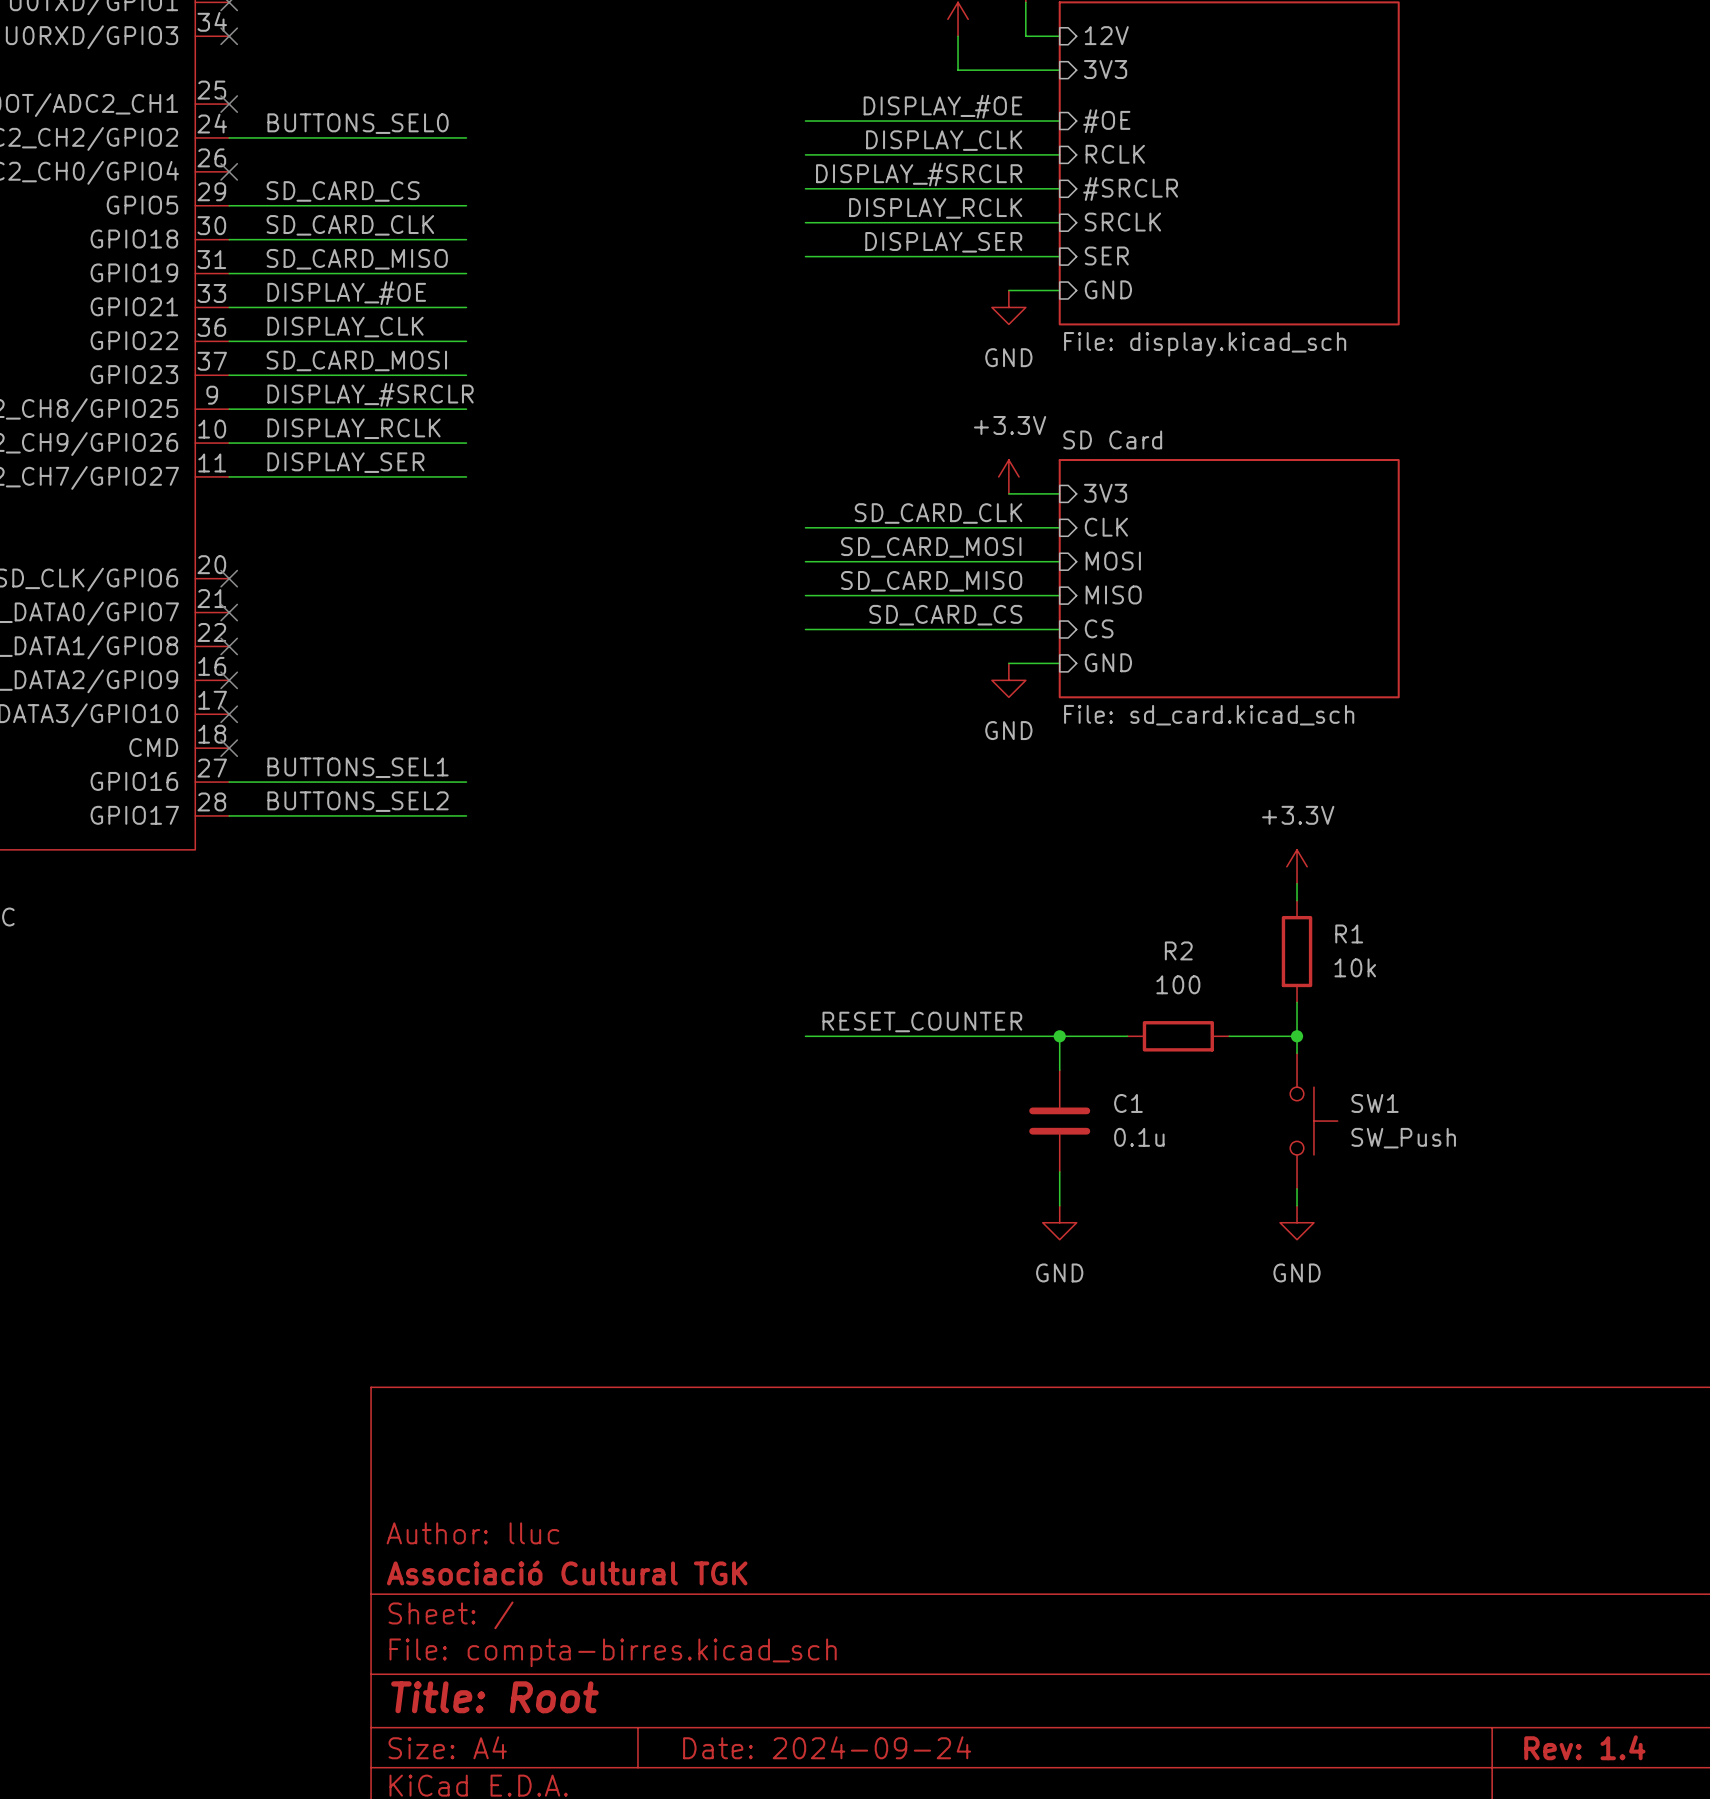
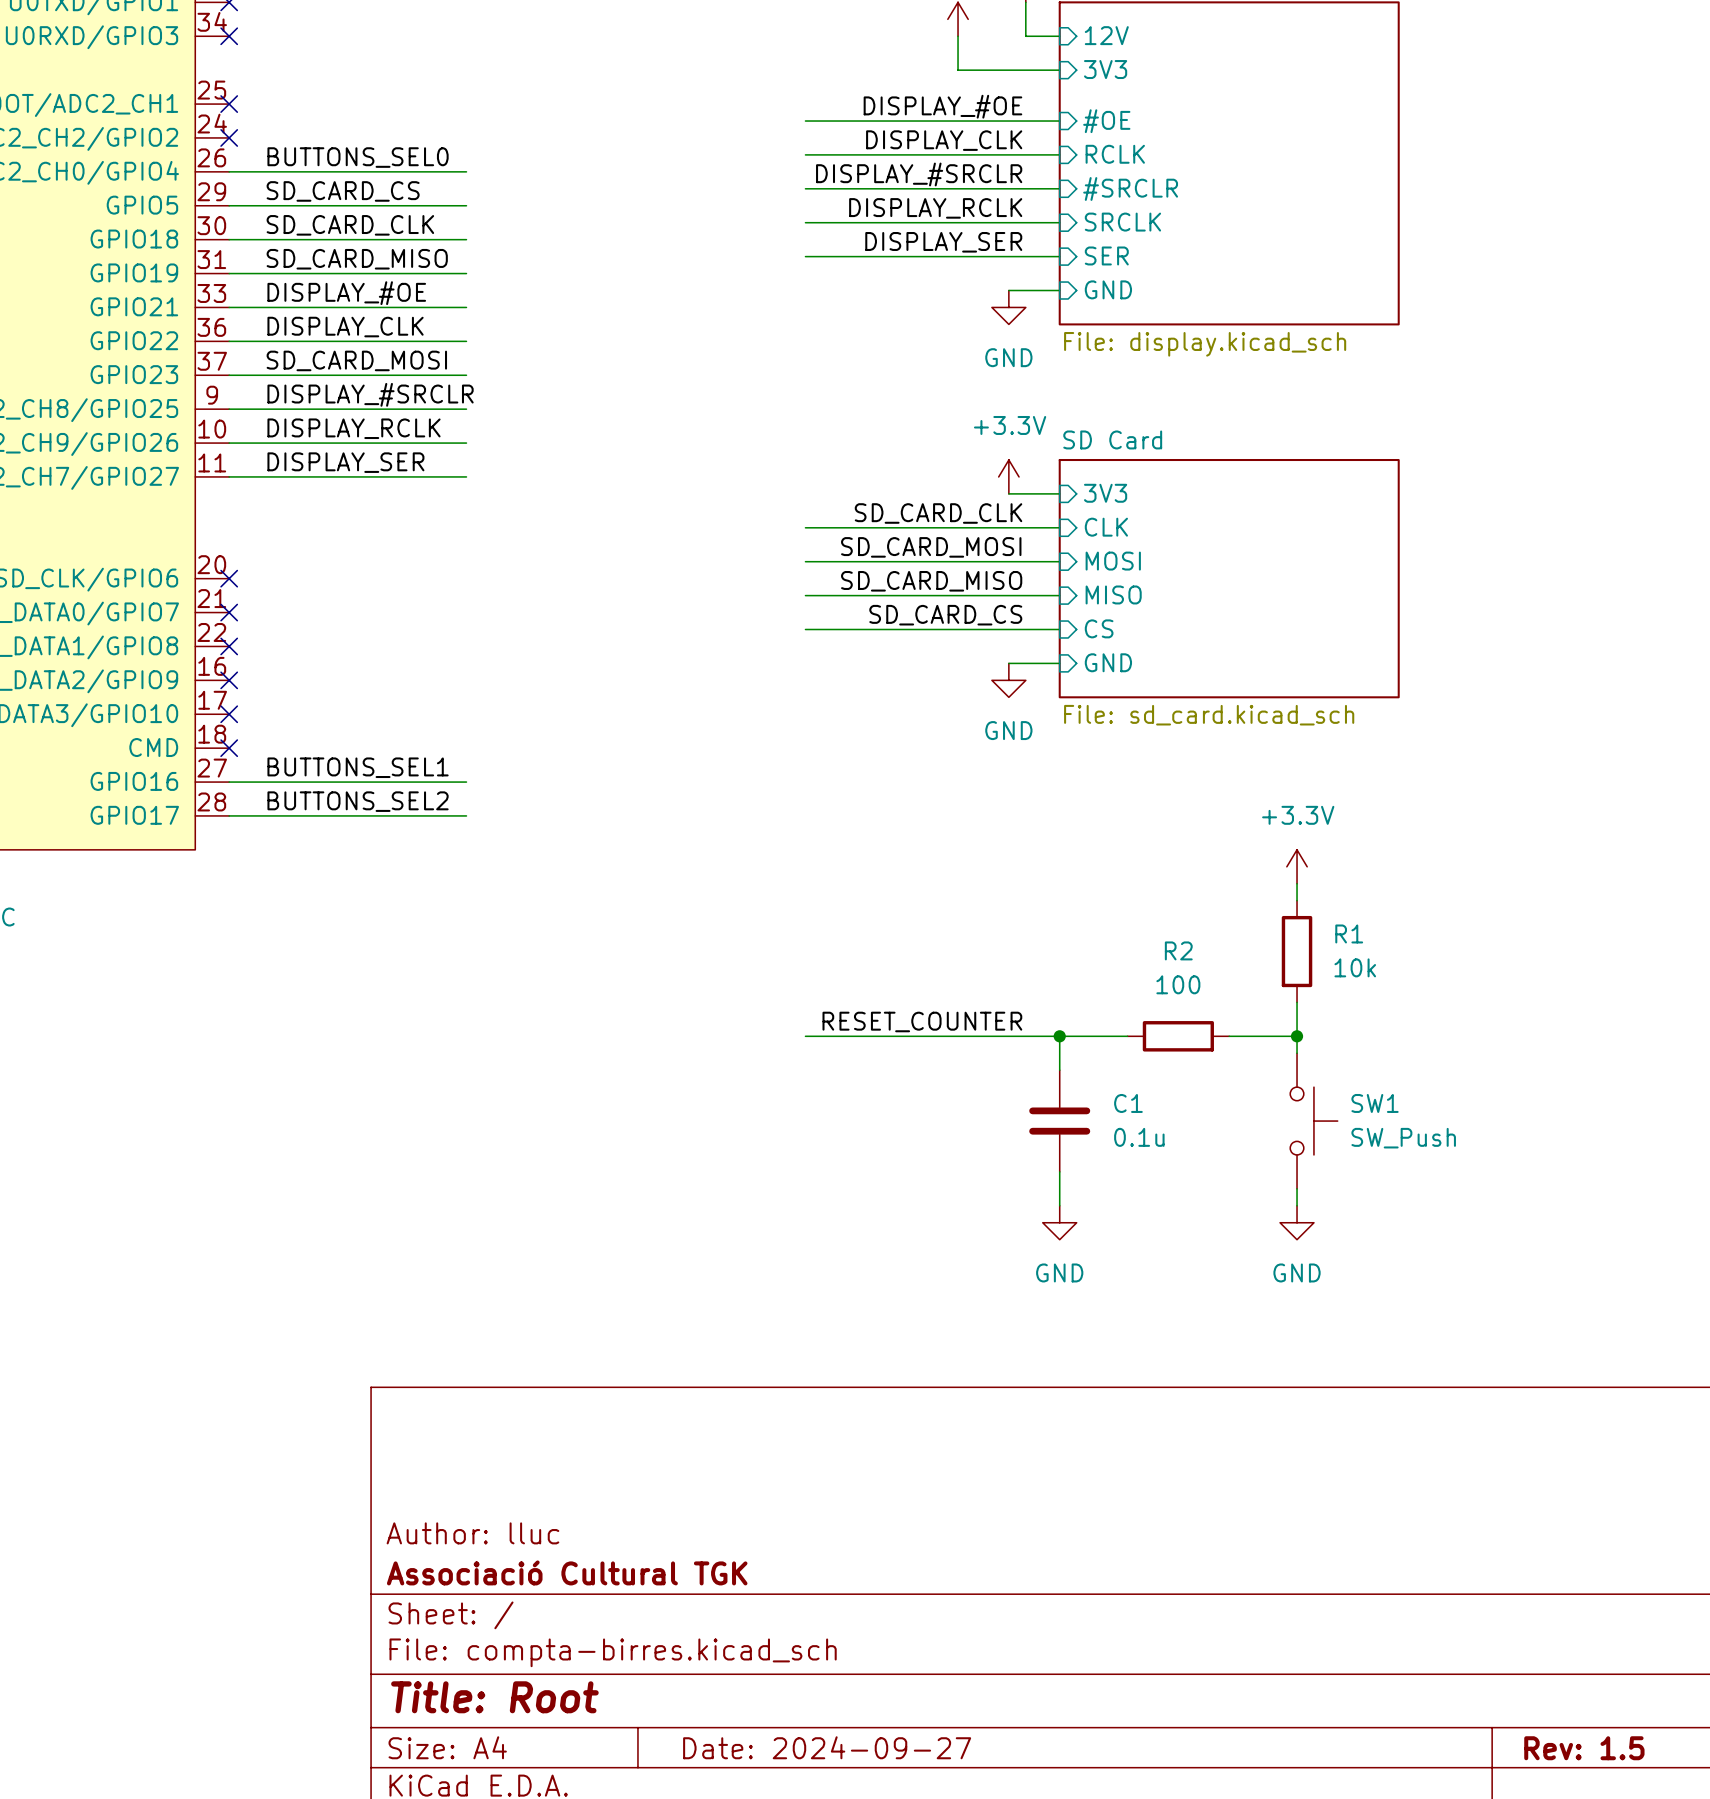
label position: BUTTONS_SEL0 (358, 123) -> BUTTONS_SEL0 (358, 157)
wire: (229, 137) (466, 137) -> (229, 171) (466, 171)
no-connect mark position: (229, 171) -> (229, 137)
title block: Date: 2024-09-24 (827, 1747) -> Date: 2024-09-27 (827, 1747)
title block: Rev: 1.4 (1584, 1747) -> Rev: 1.5 (1584, 1748)

